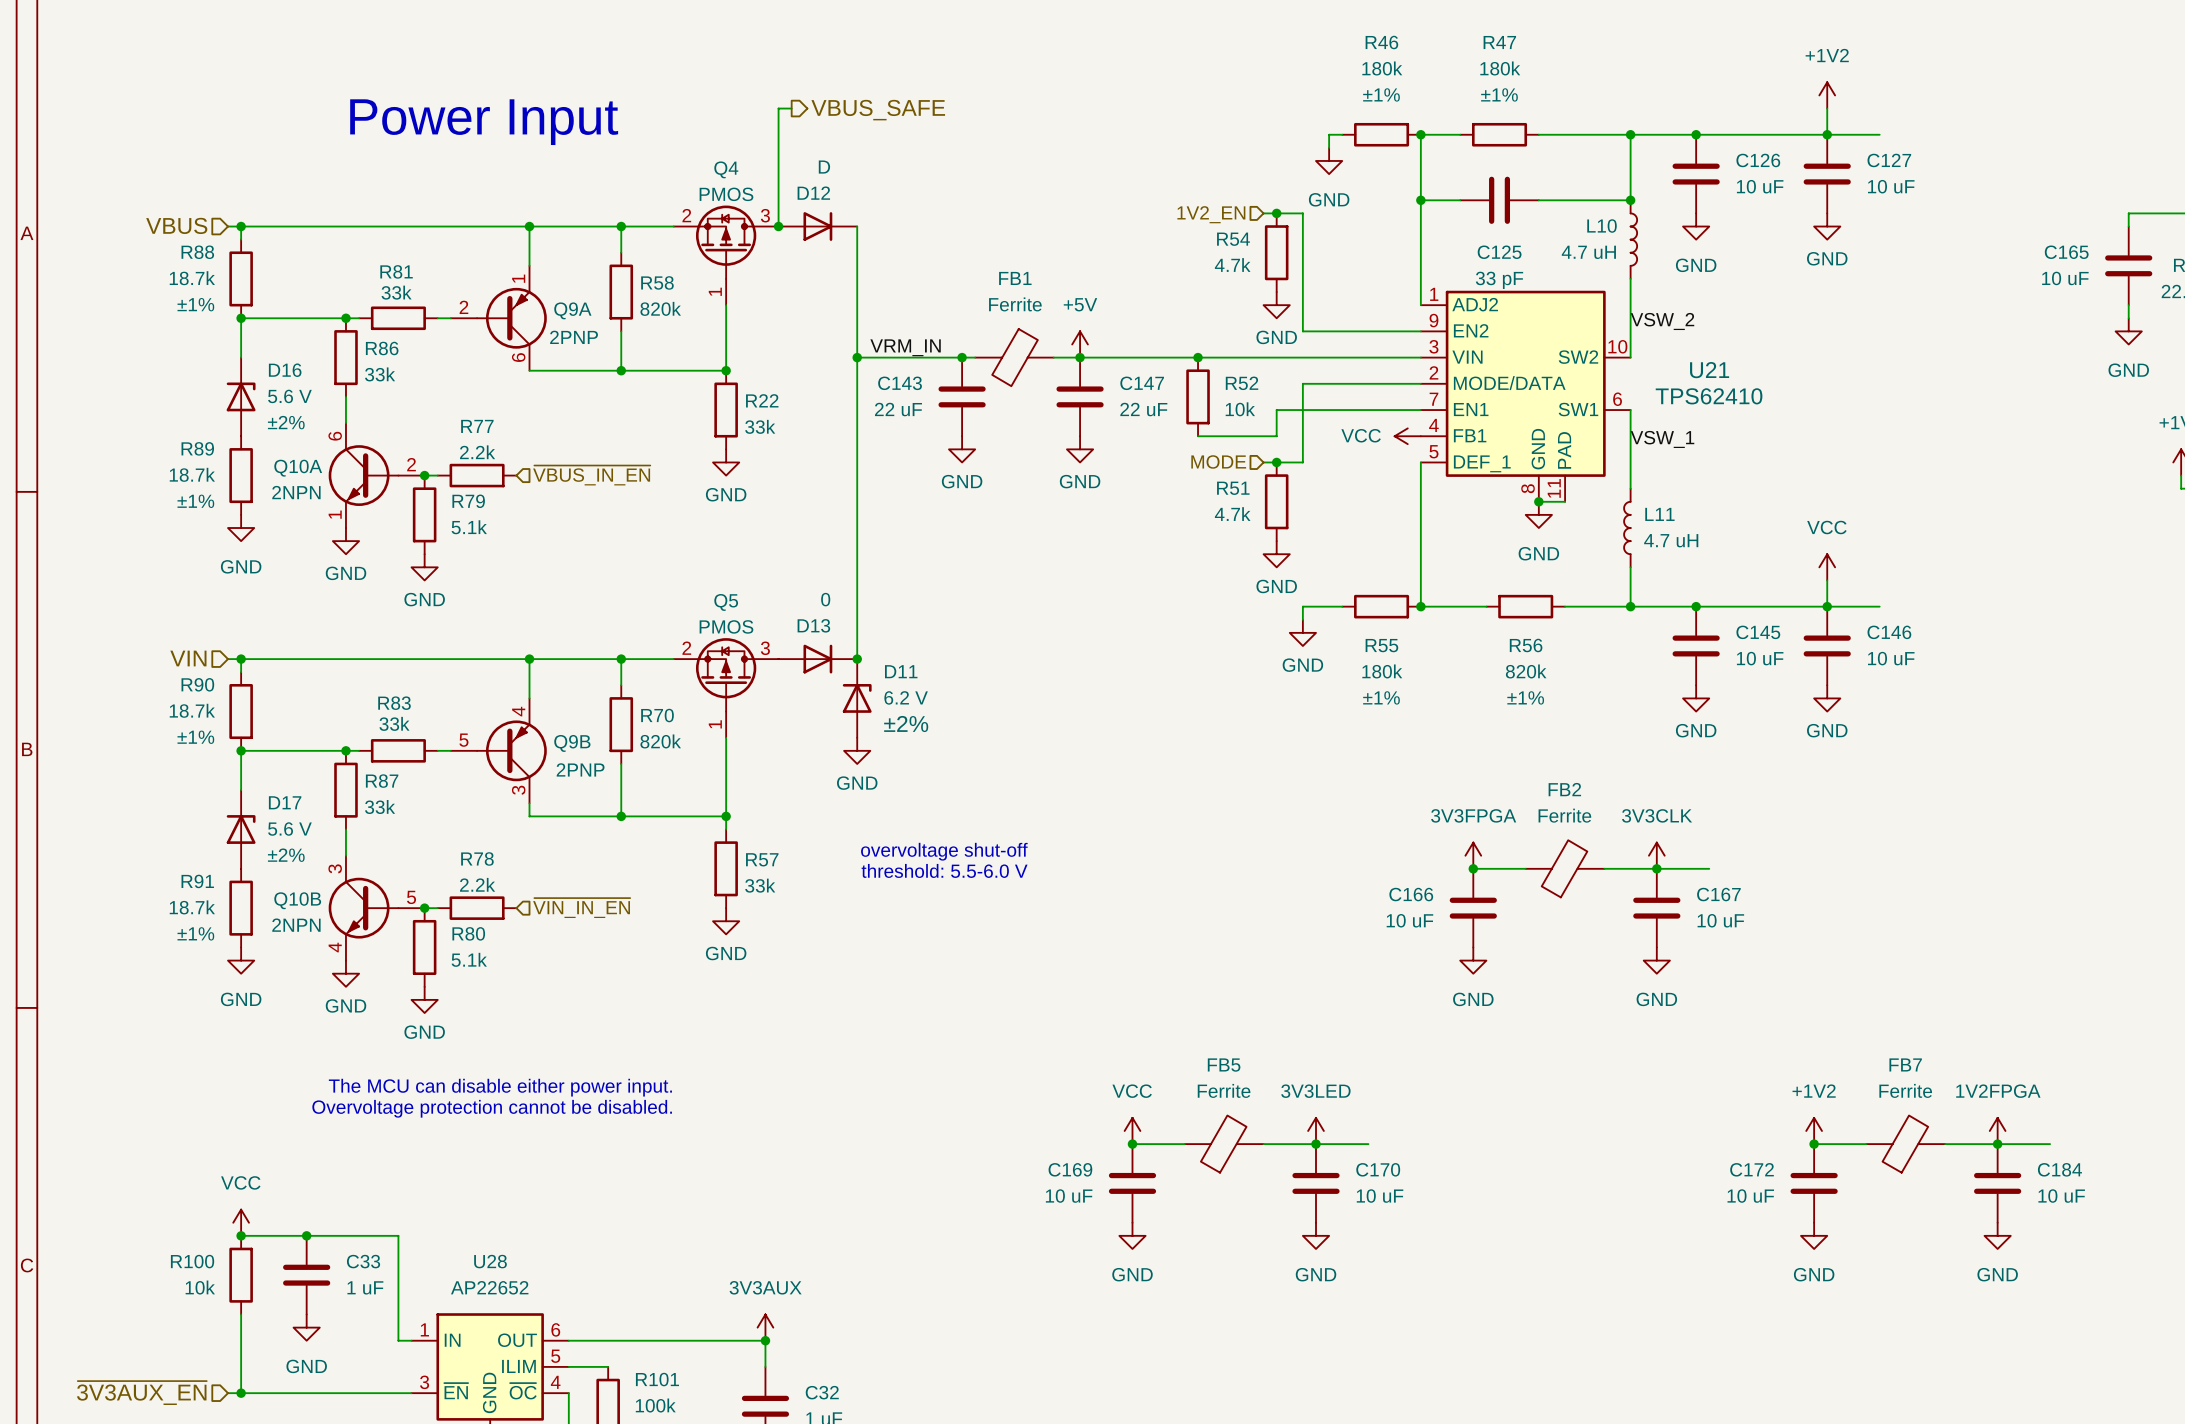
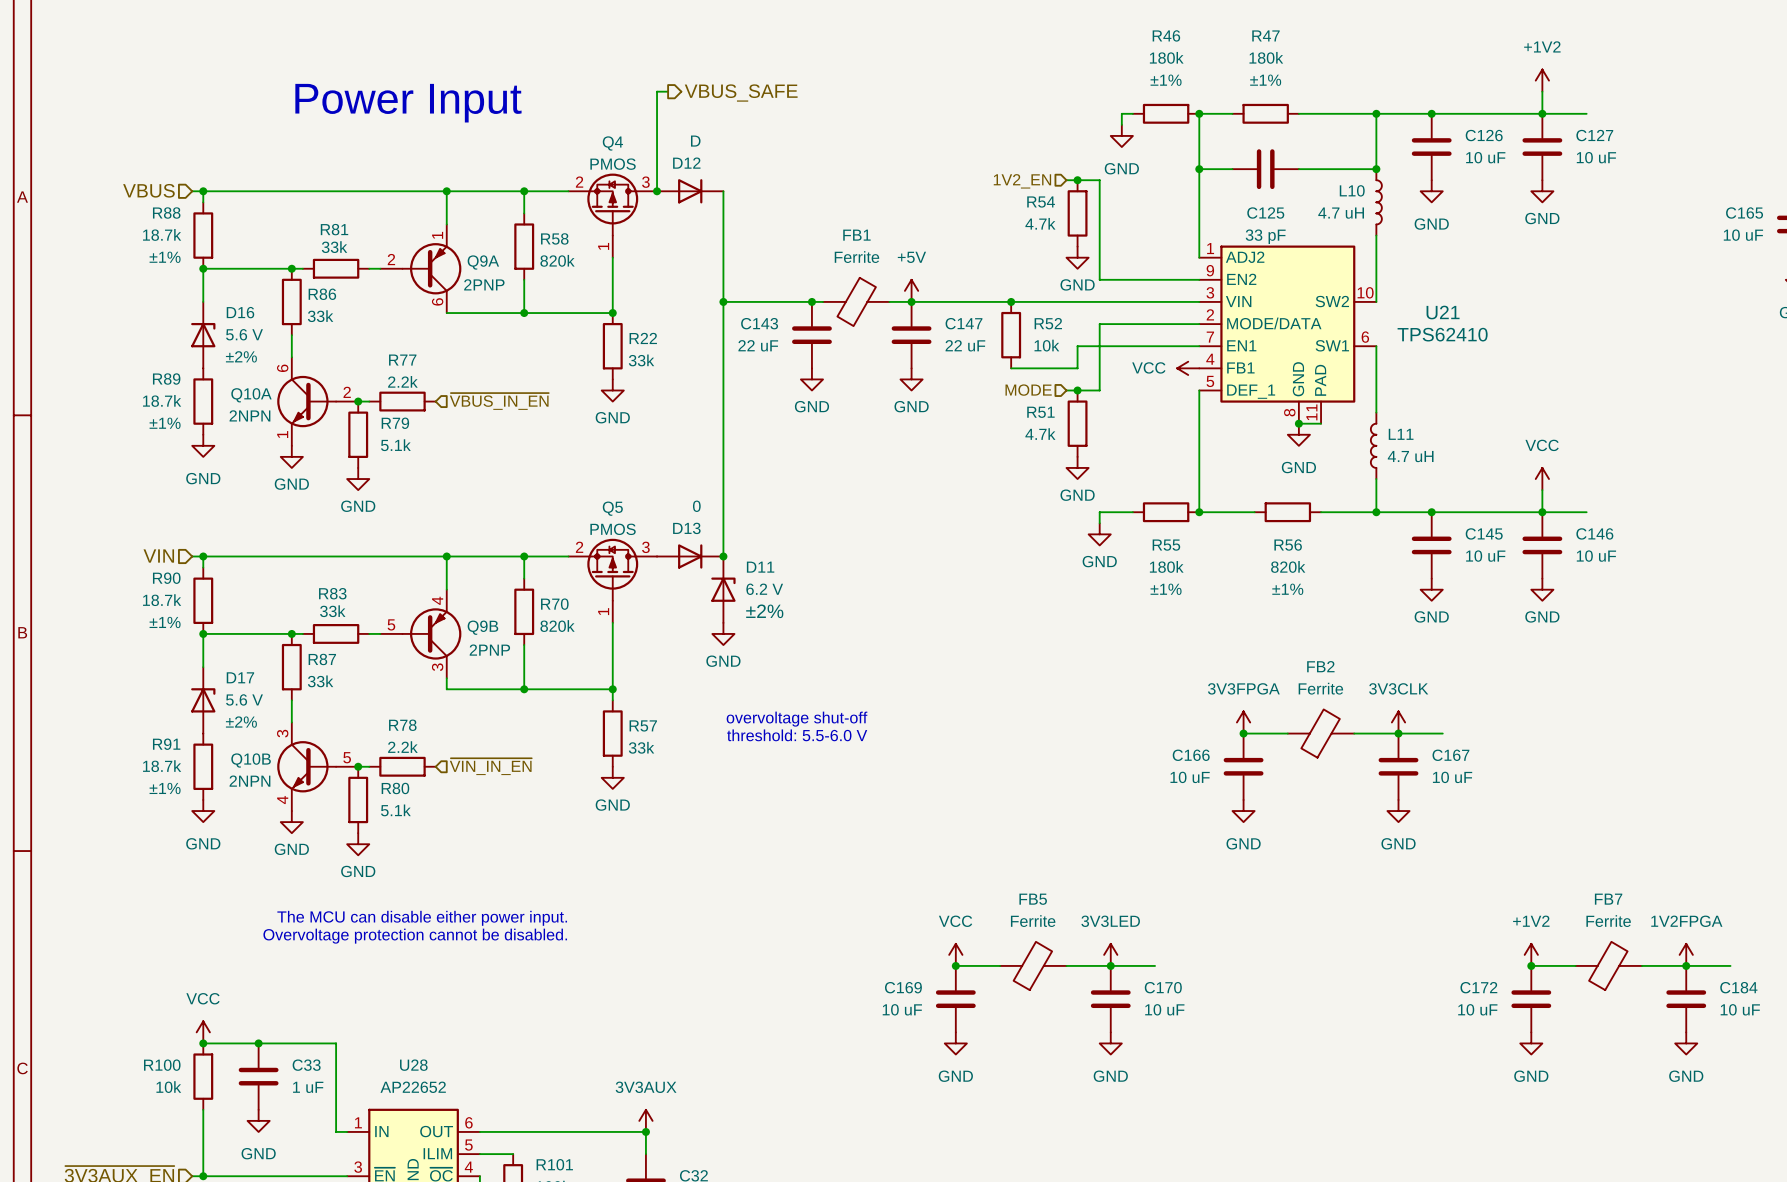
label: VSW_2 (1662, 321) -> none
label: VRM_IN (905, 347) -> none
label: VSW_1 (1662, 439) -> none

